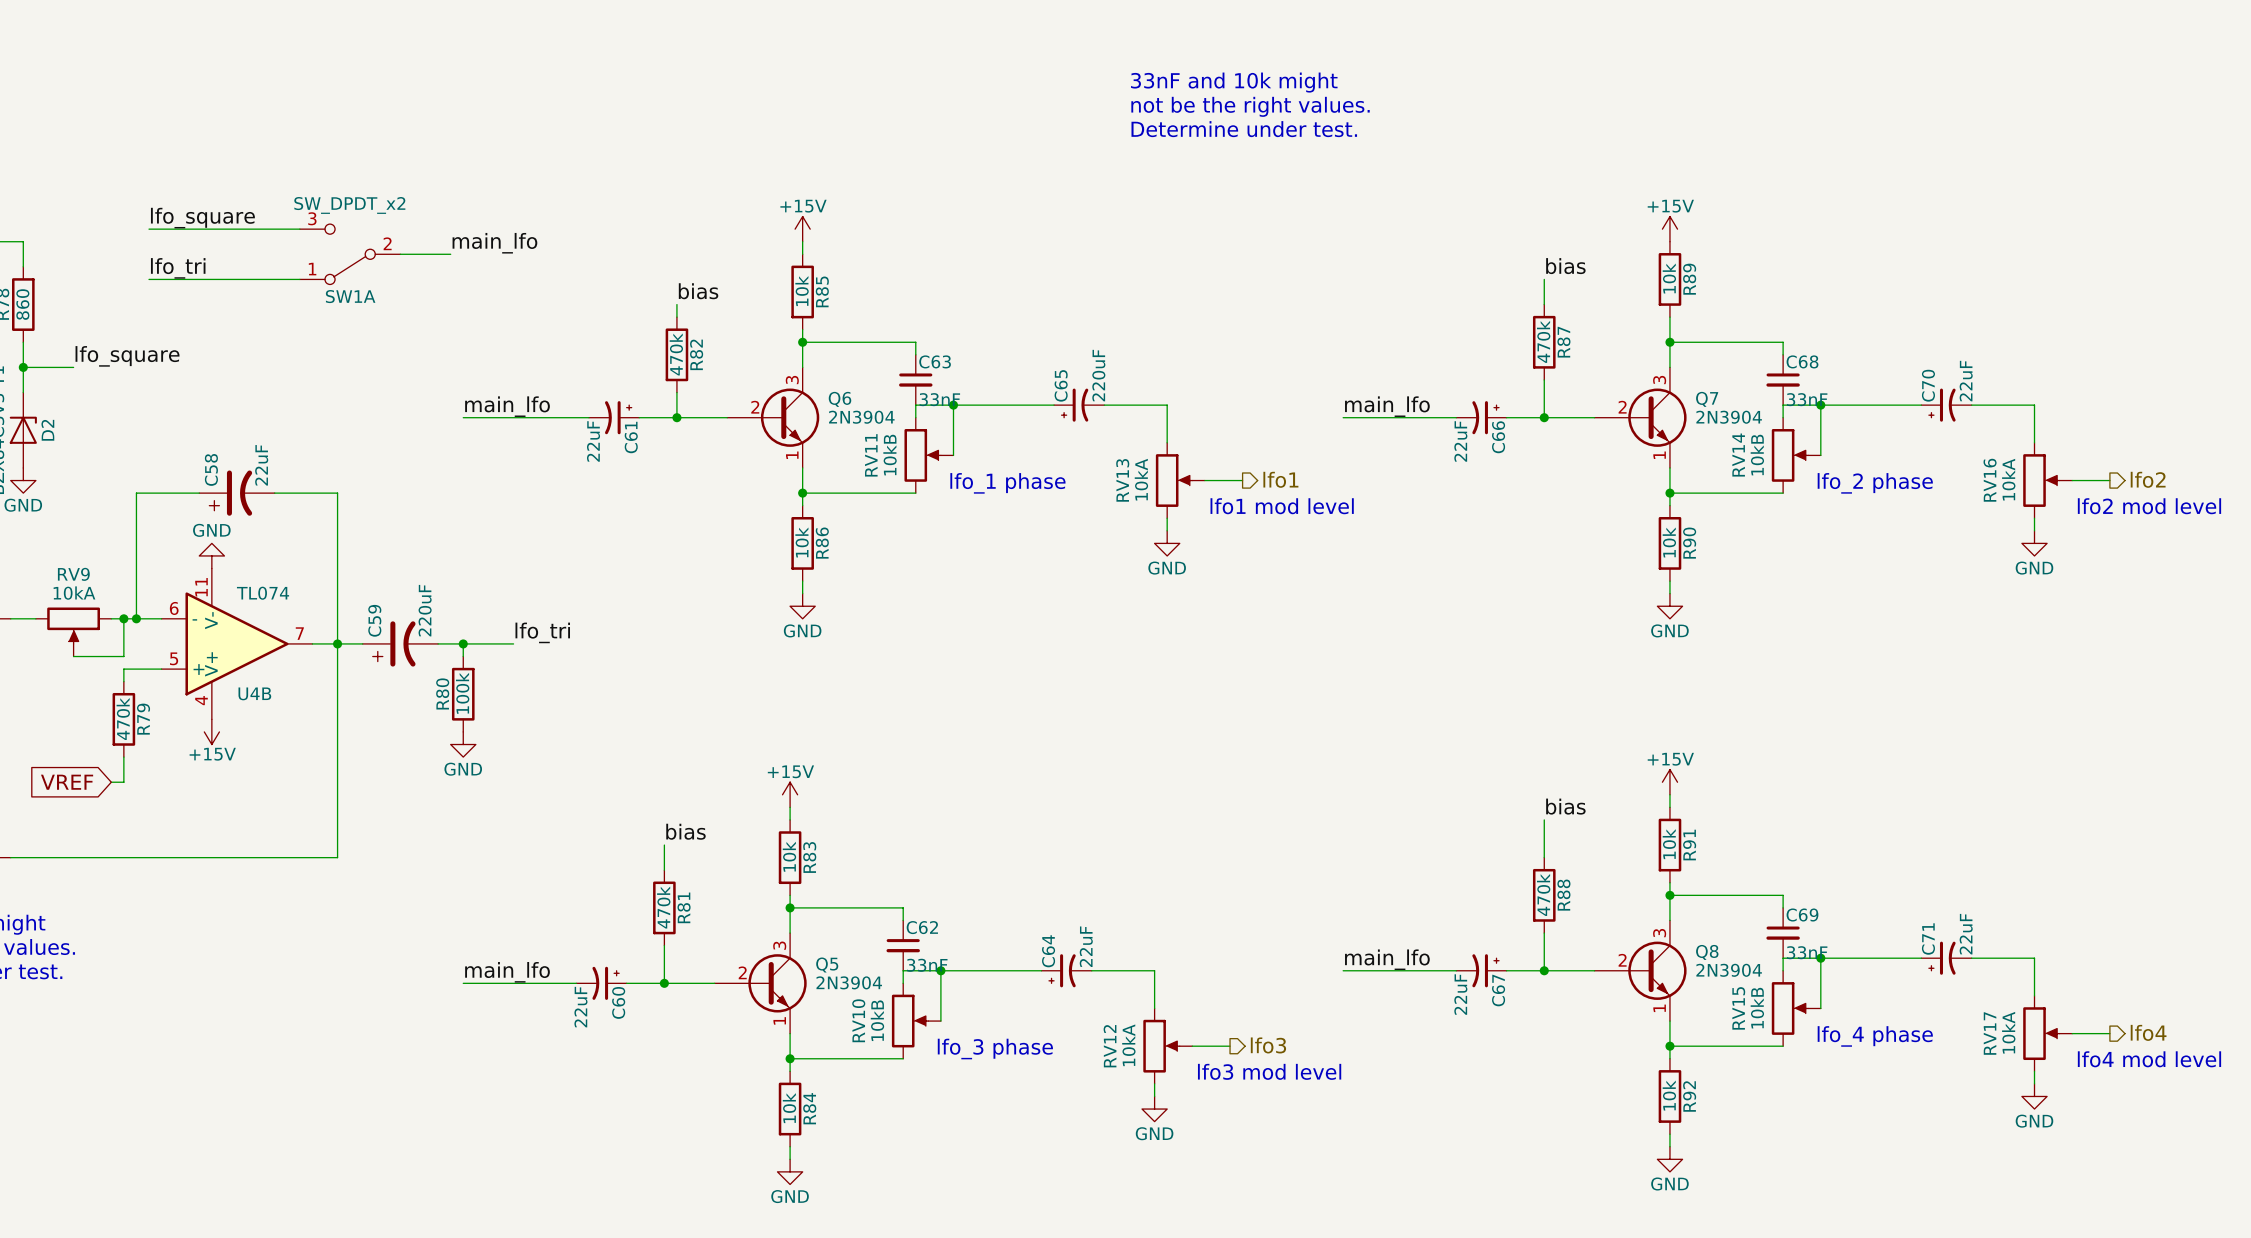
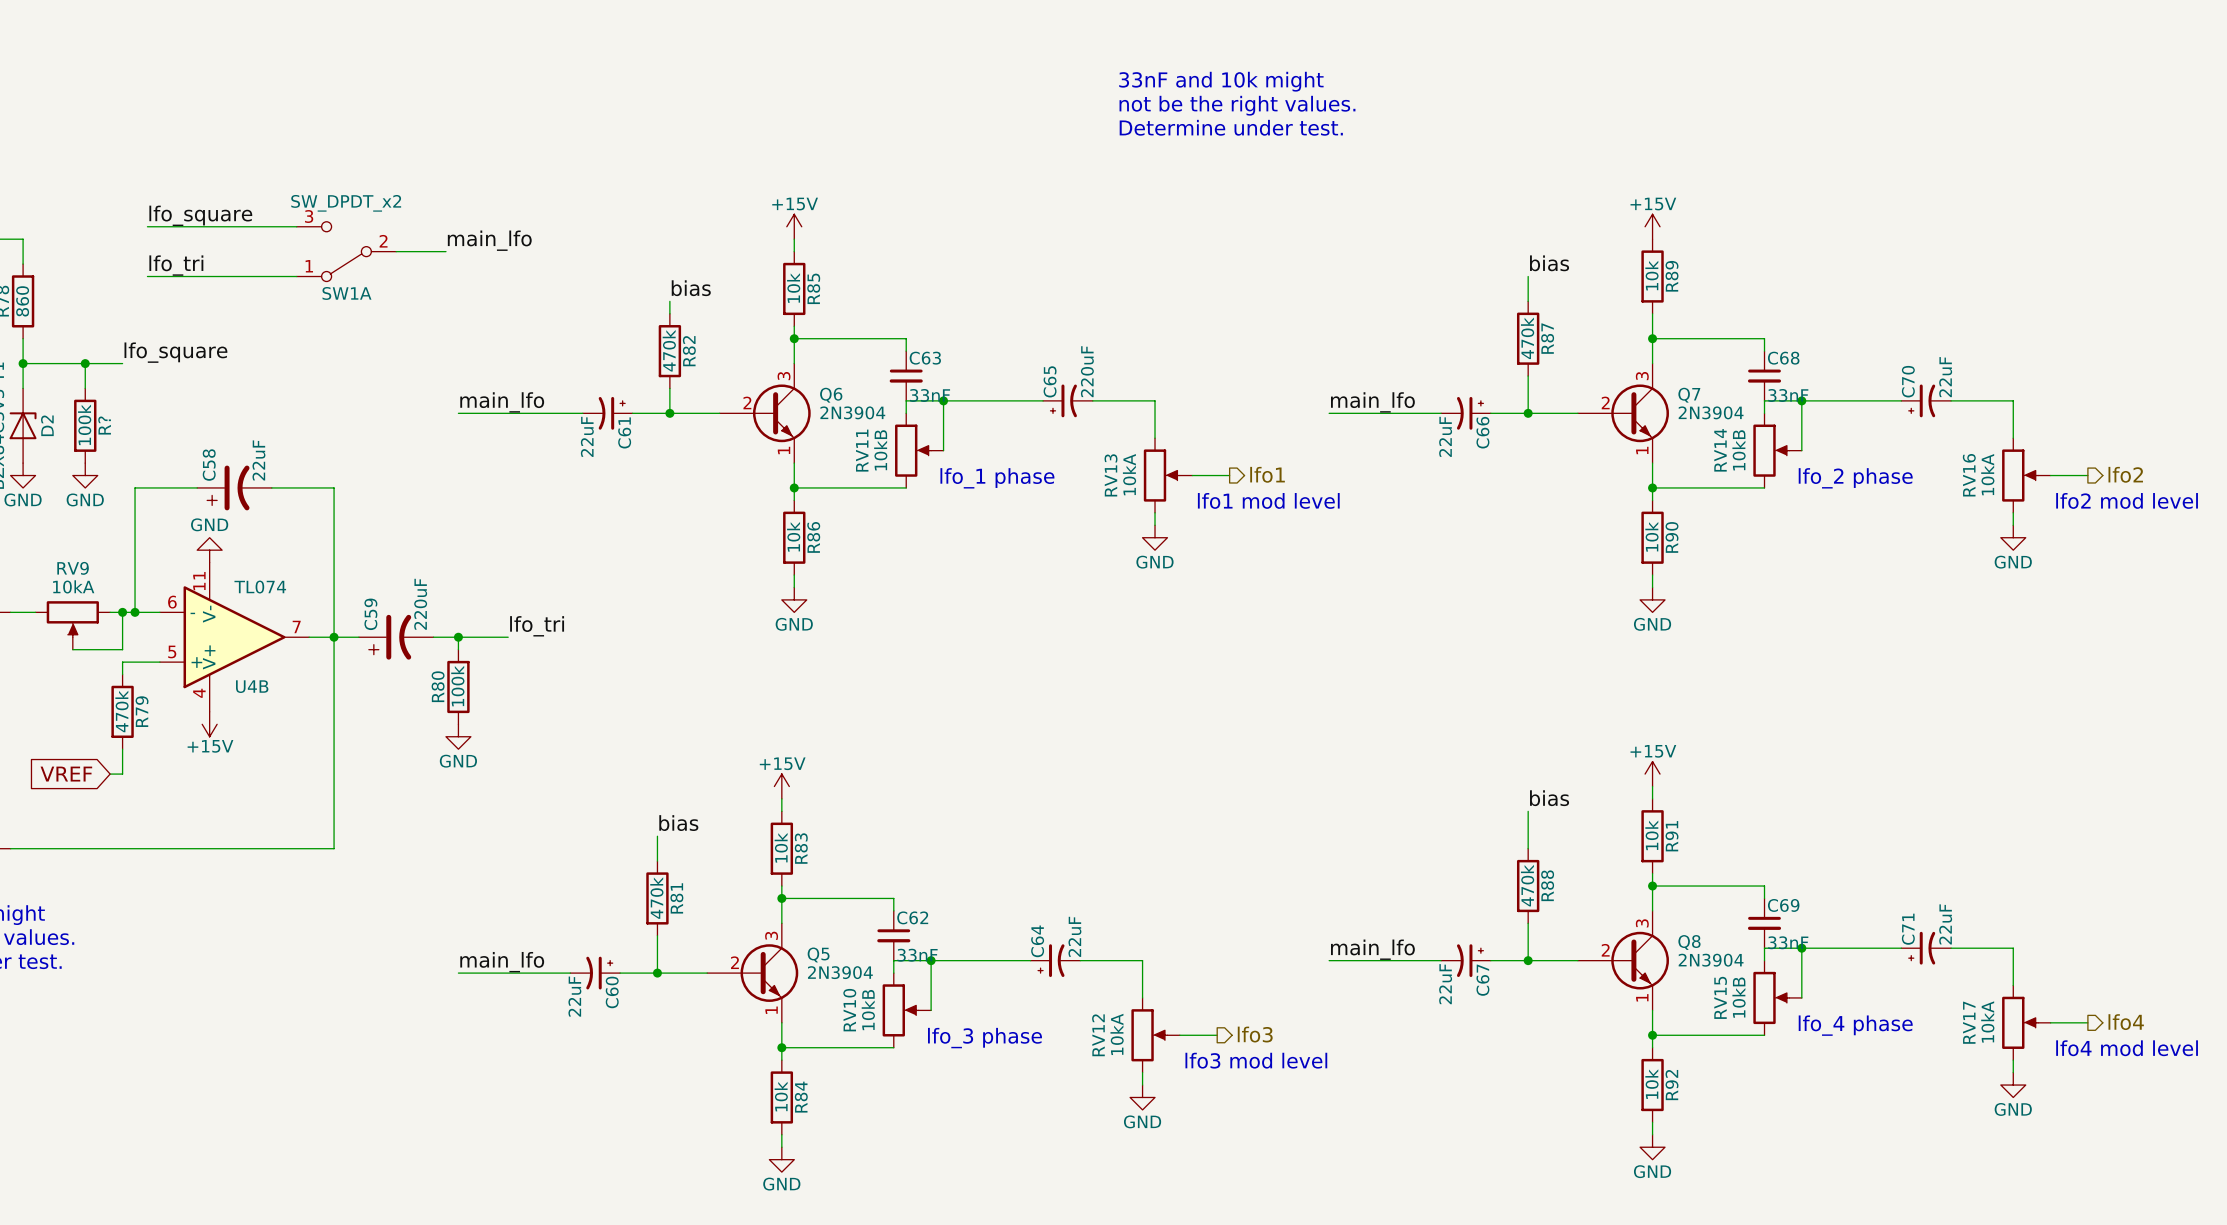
label position: lfo_square (127, 356) -> lfo_square (175, 352)
wire: none -> (72, 363) (122, 363)
wire: none -> (85, 363) (85, 388)
junction: none -> (85, 363)
R?: none -> 100k (85, 425)
power symbol: none -> GND (85, 475)

